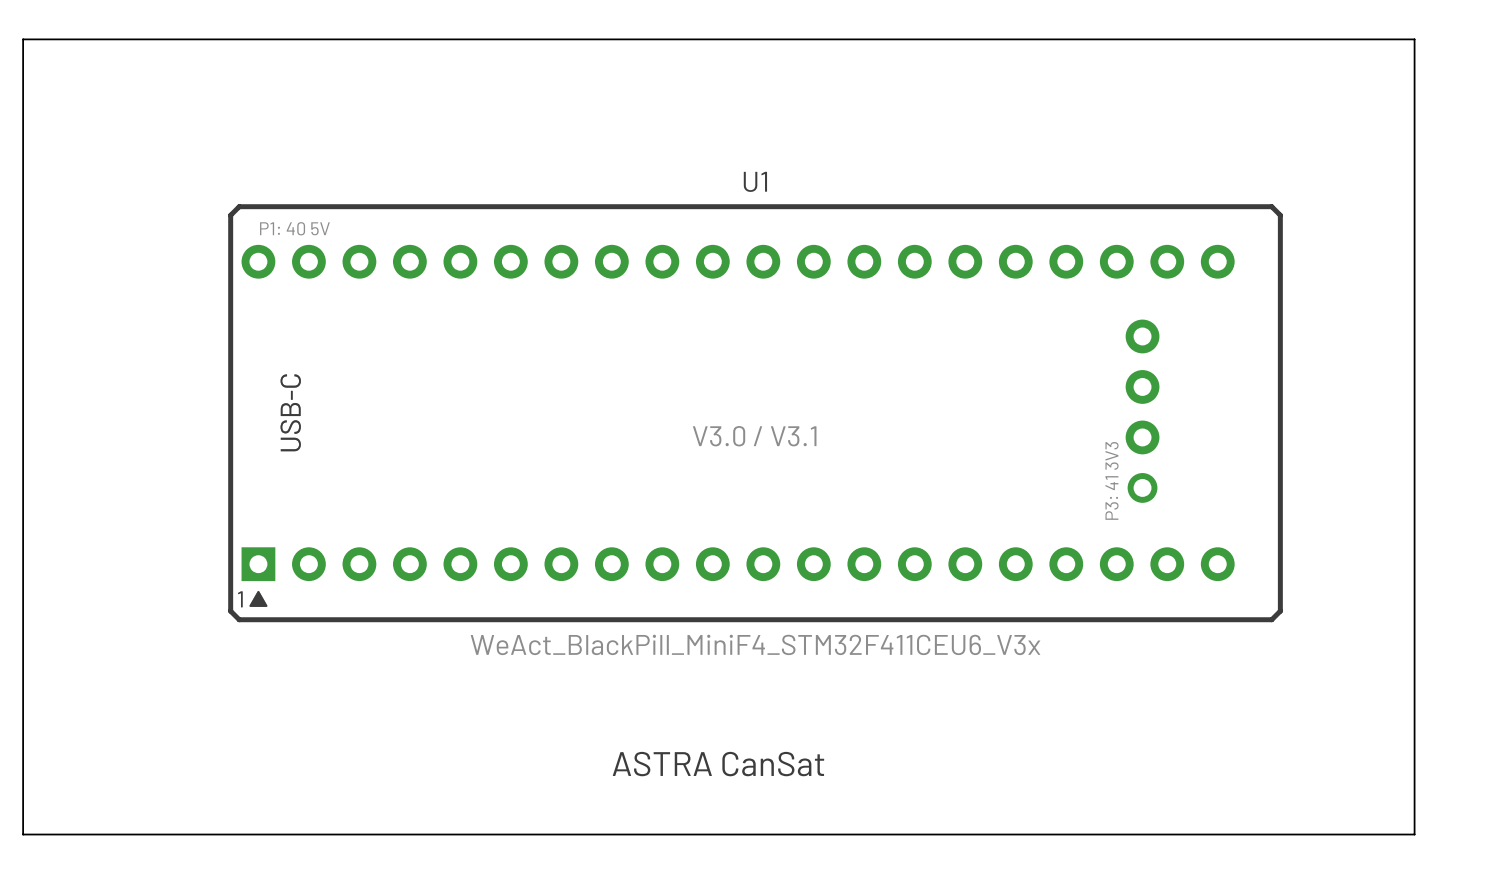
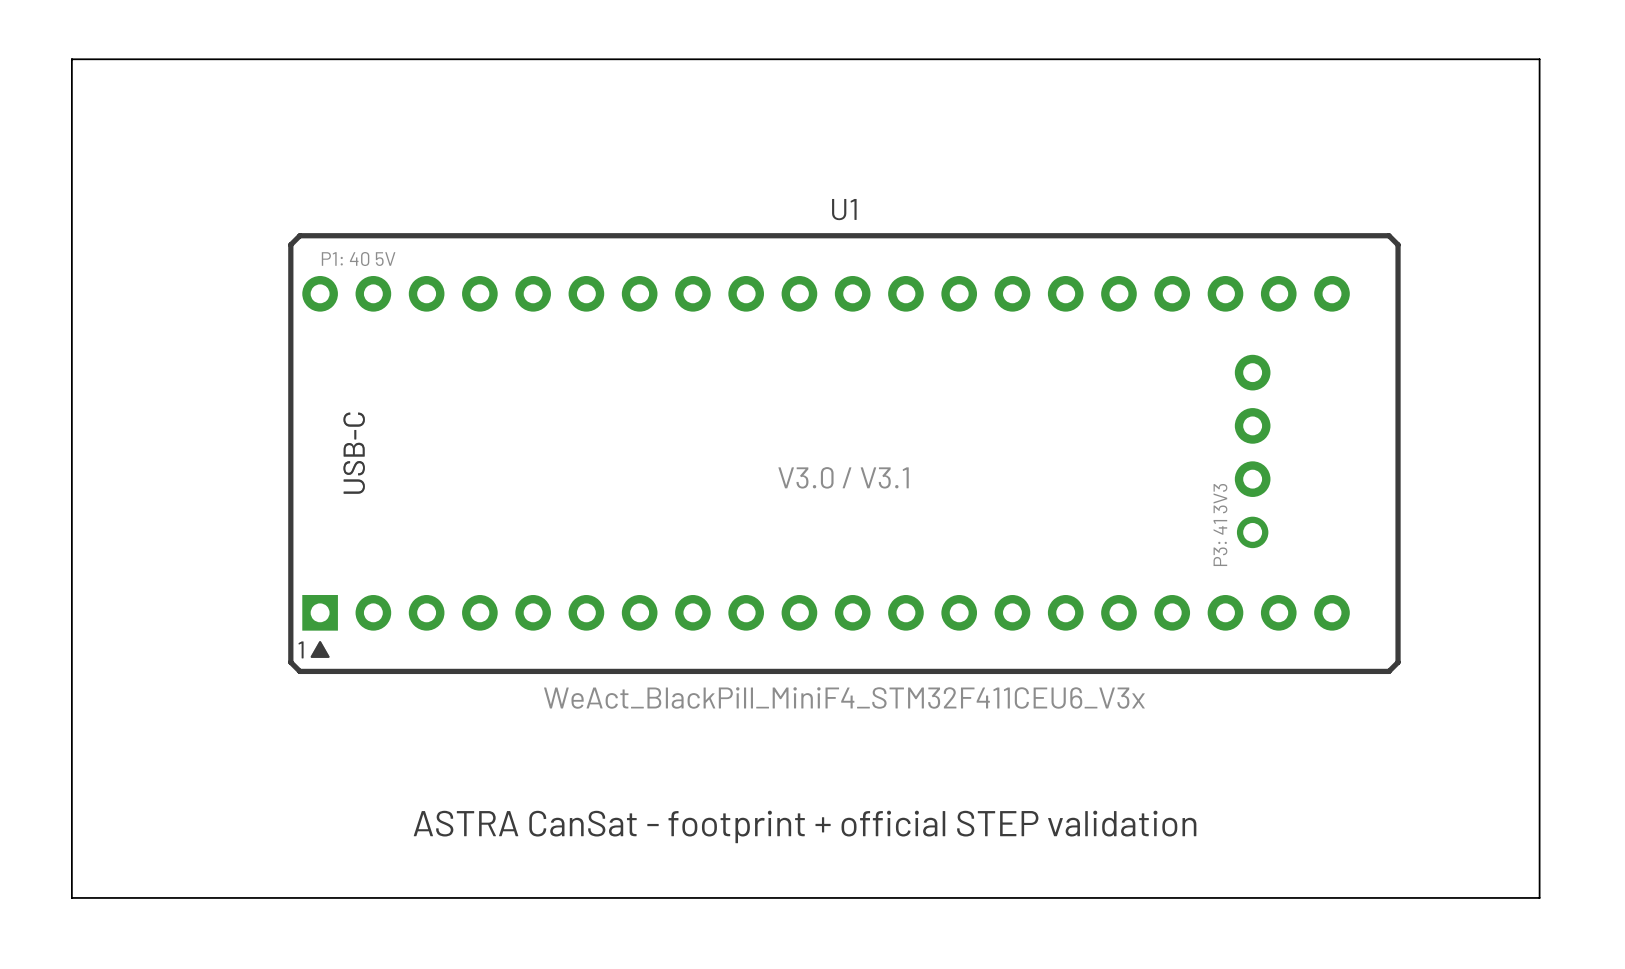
text: ASTRA CanSat (718, 764) -> ASTRA CanSat - footprint + official STEP validation (805, 826)

